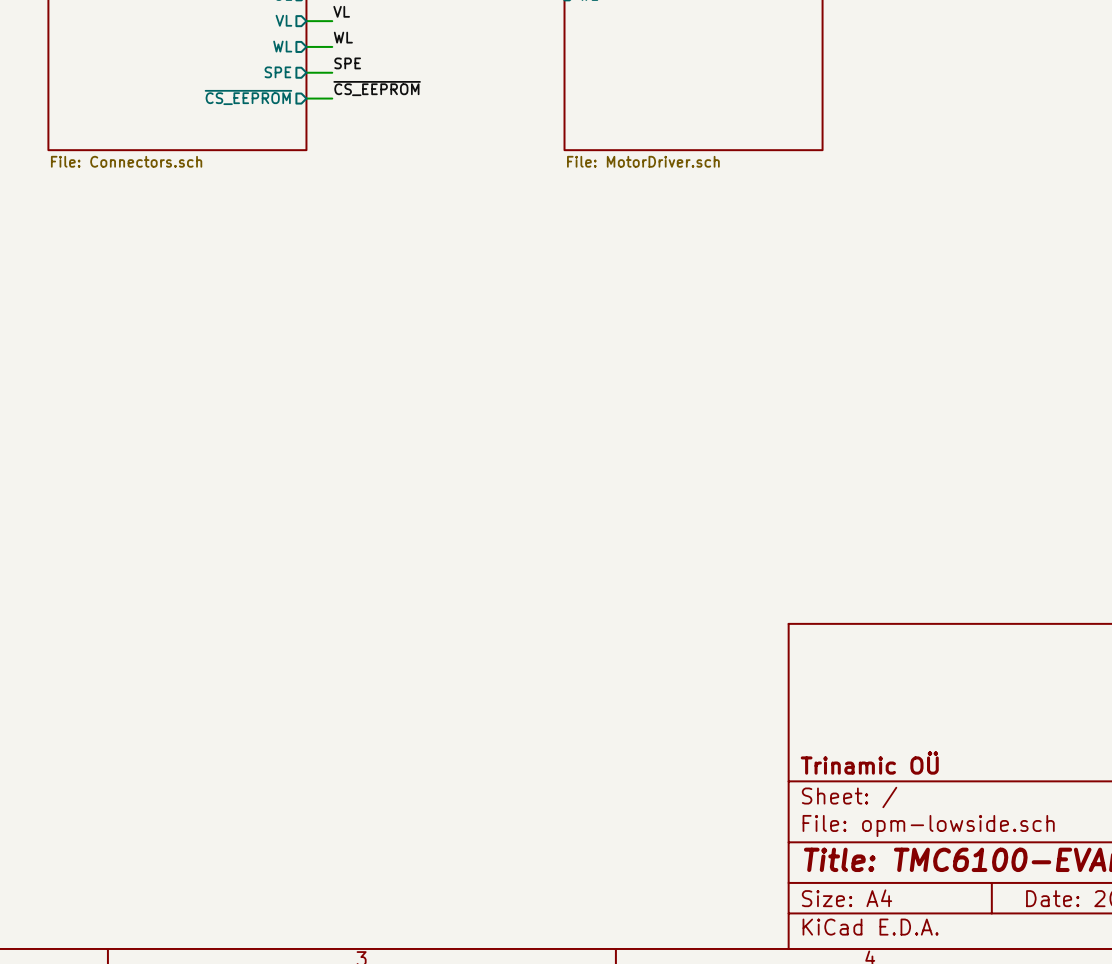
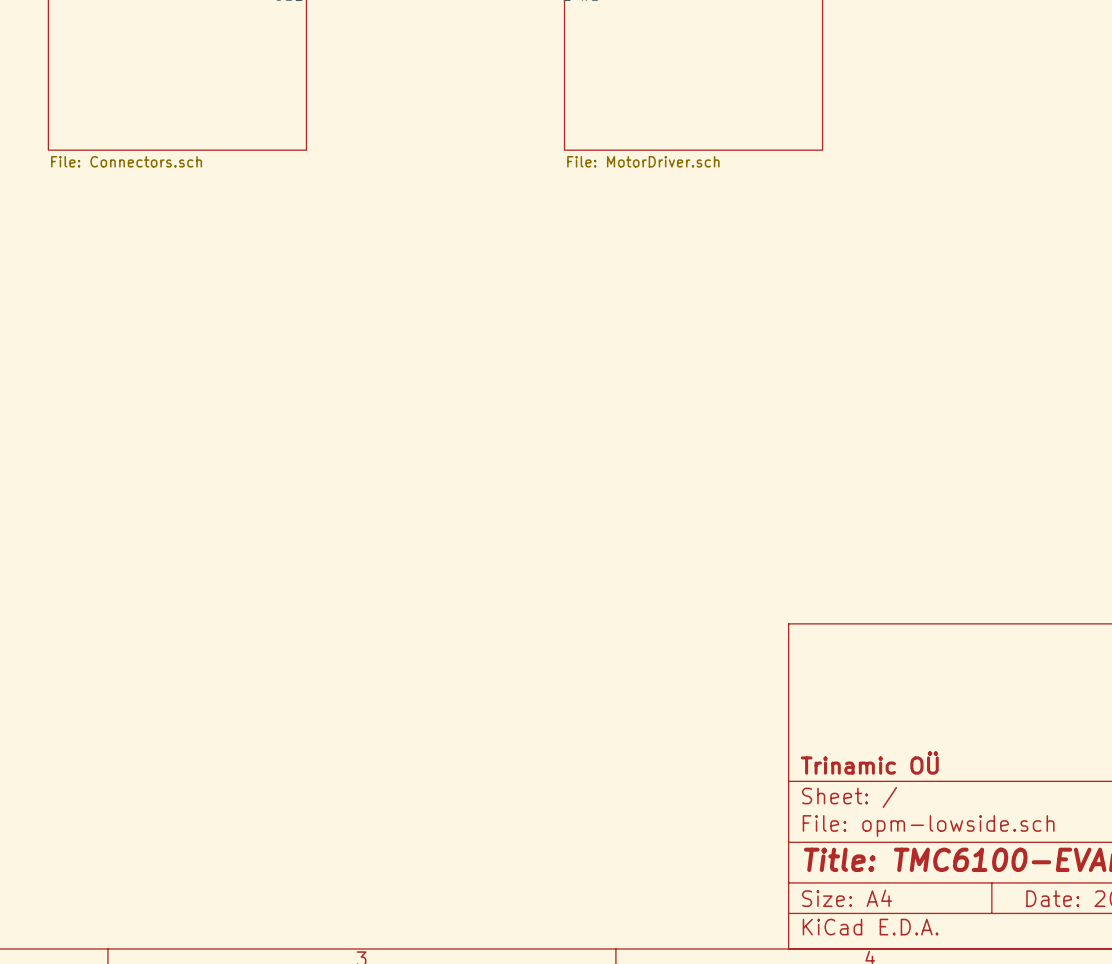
label: VL (341, 11) -> none
sheet pin: VL (283, 20) -> none
wire: (306, 21) (332, 21) -> none
label: WL (343, 37) -> none
sheet pin: WL (282, 46) -> none
wire: (306, 46) (332, 46) -> none
label: SPE (347, 63) -> none
sheet pin: SPE (277, 72) -> none
wire: (306, 72) (332, 72) -> none
label: ~{CS_EEPROM} (377, 88) -> none
sheet pin: ~{CS_EEPROM} (248, 97) -> none
wire: (306, 98) (332, 98) -> none

